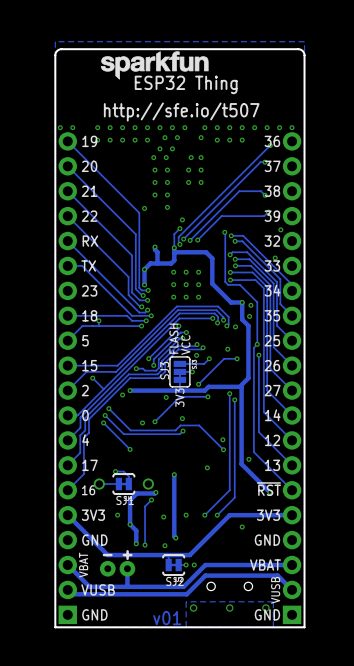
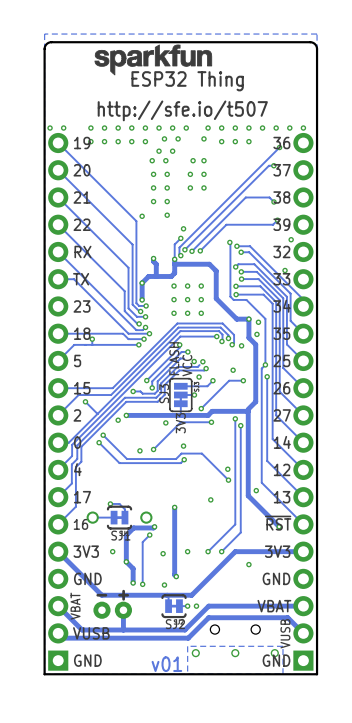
via: (182, 338) -> none
via: none -> (194, 361)
via: none -> (202, 361)
via: (197, 344) -> none
track: (103, 422) (130, 449) -> none
via: (103, 422) -> none
via: (130, 449) -> none

